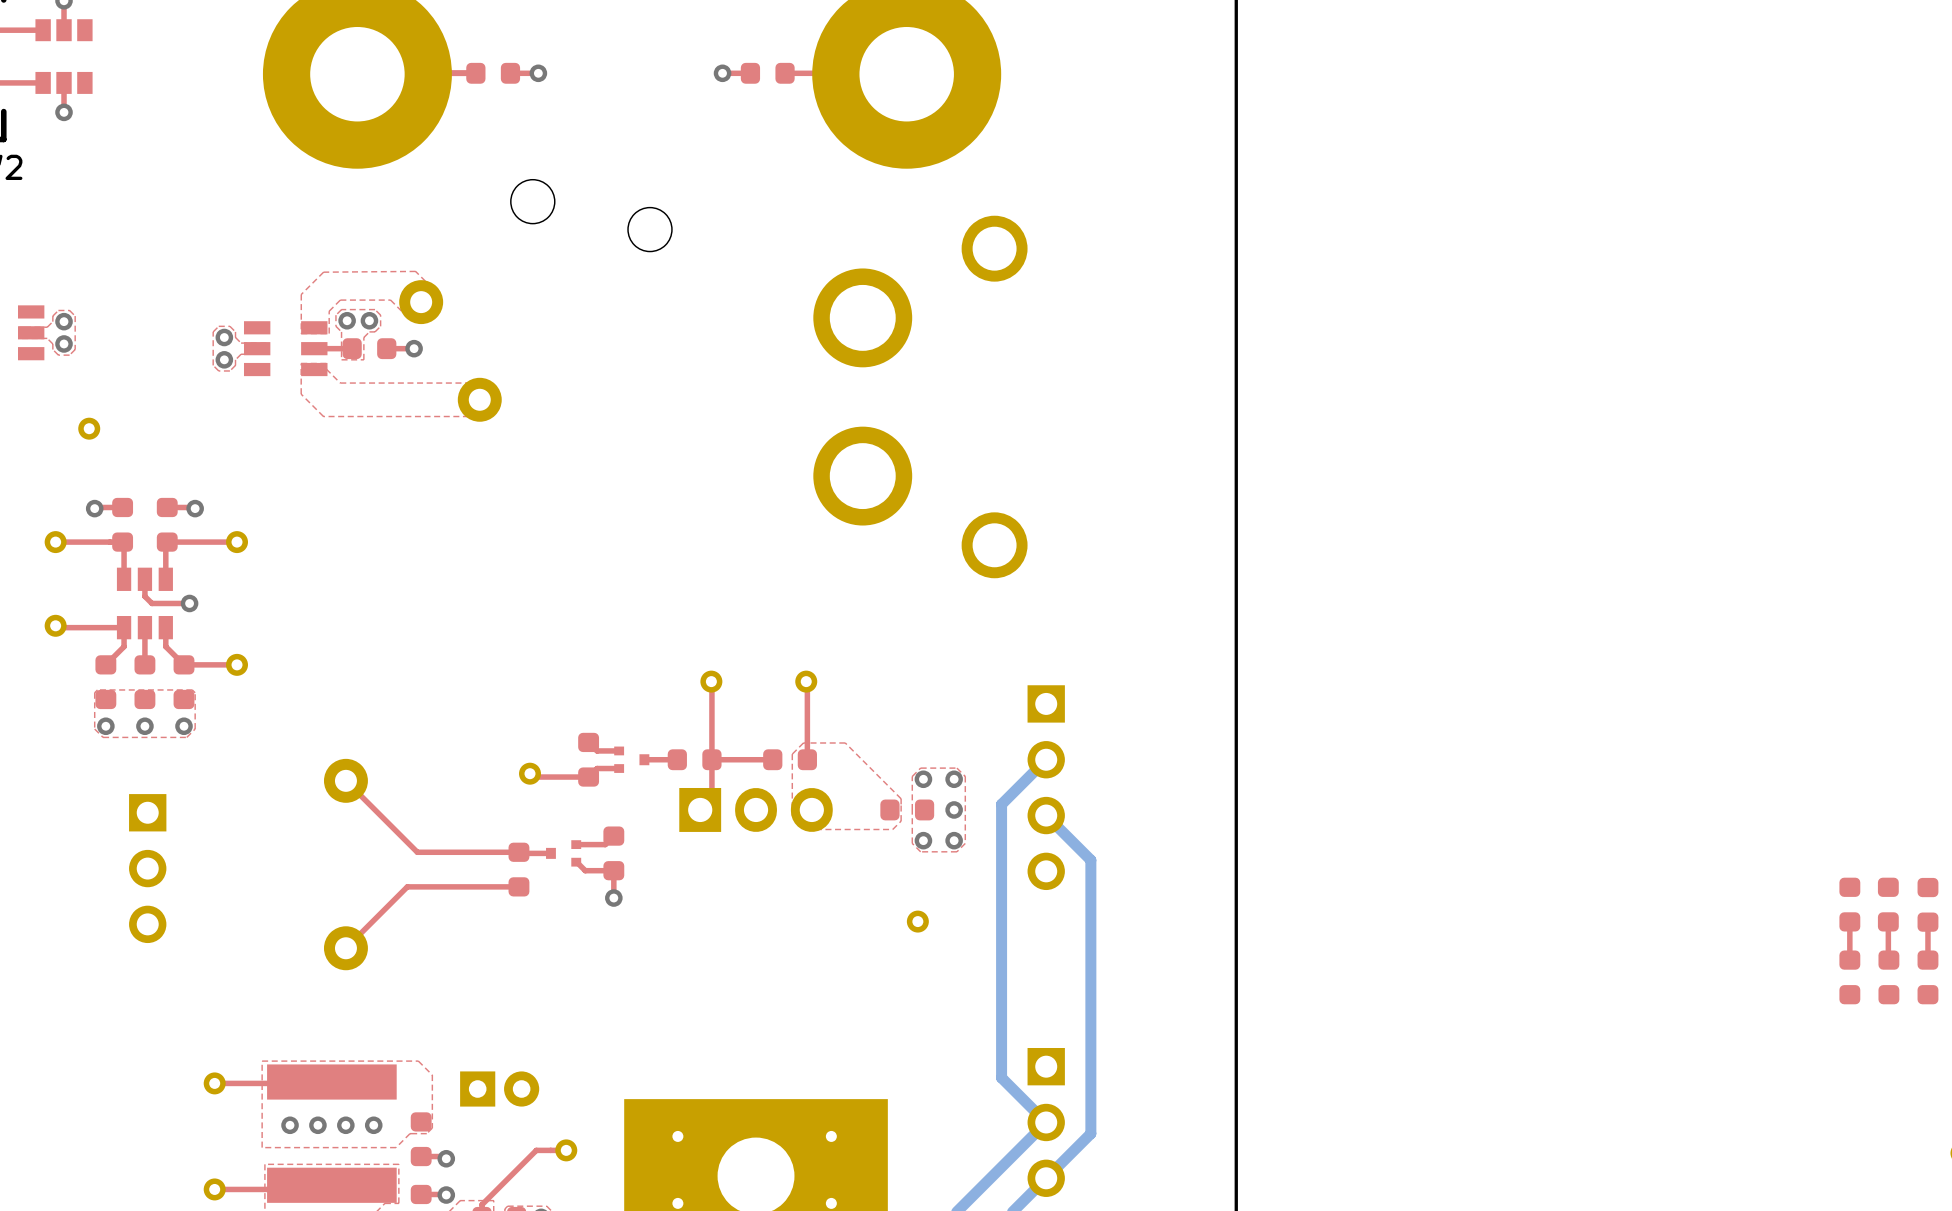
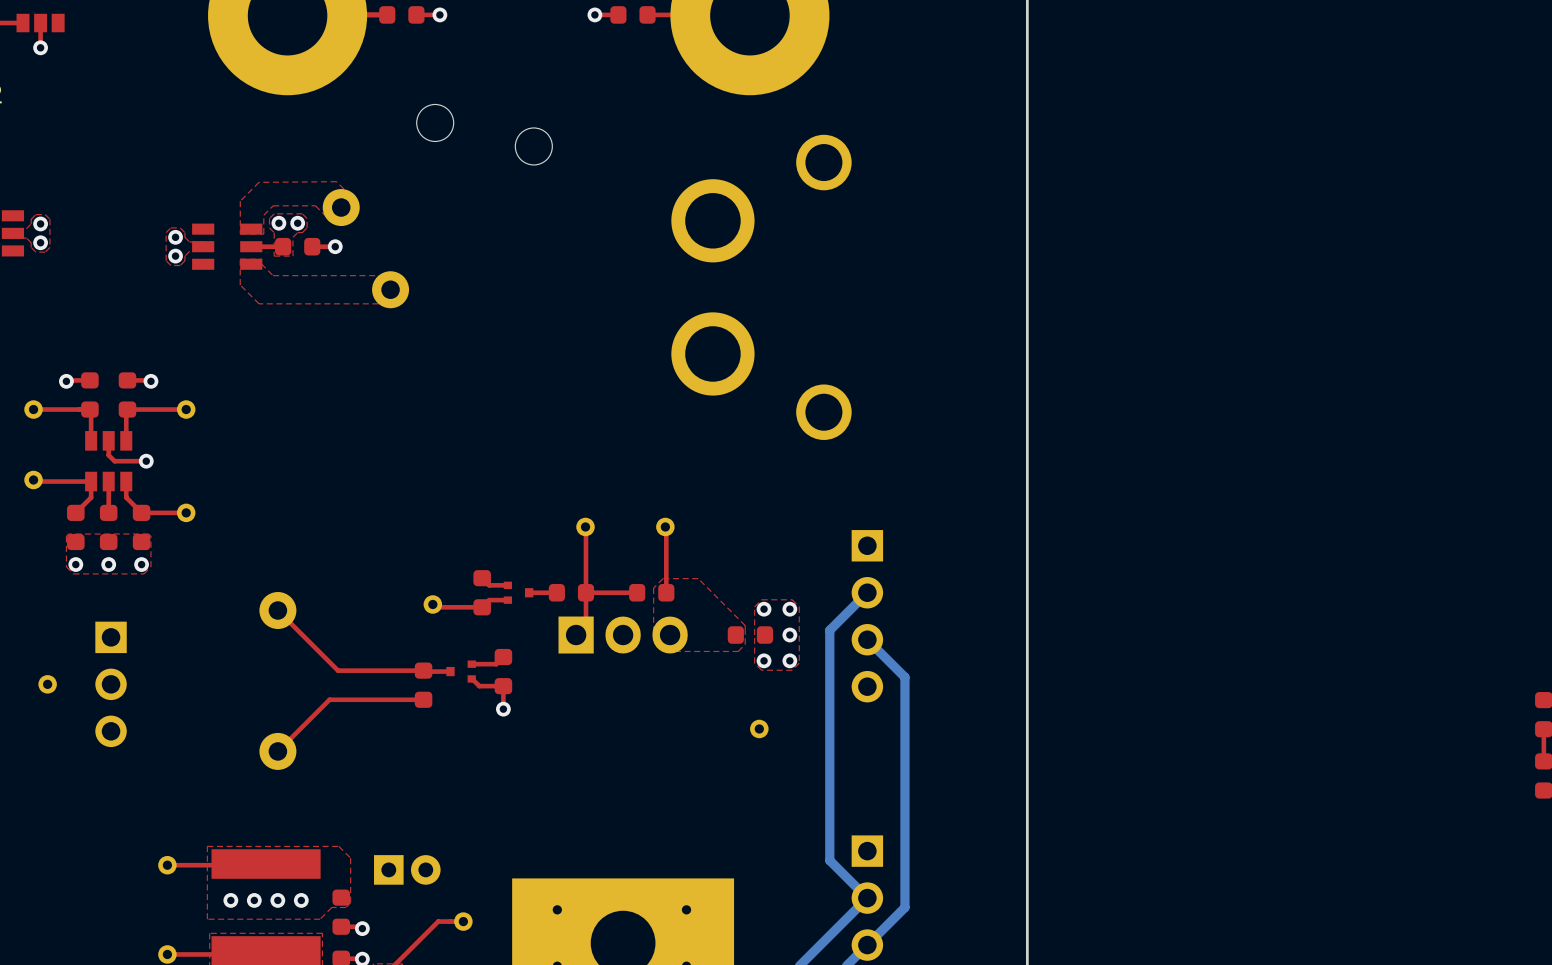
part position: (89, 428) -> (47, 684)

